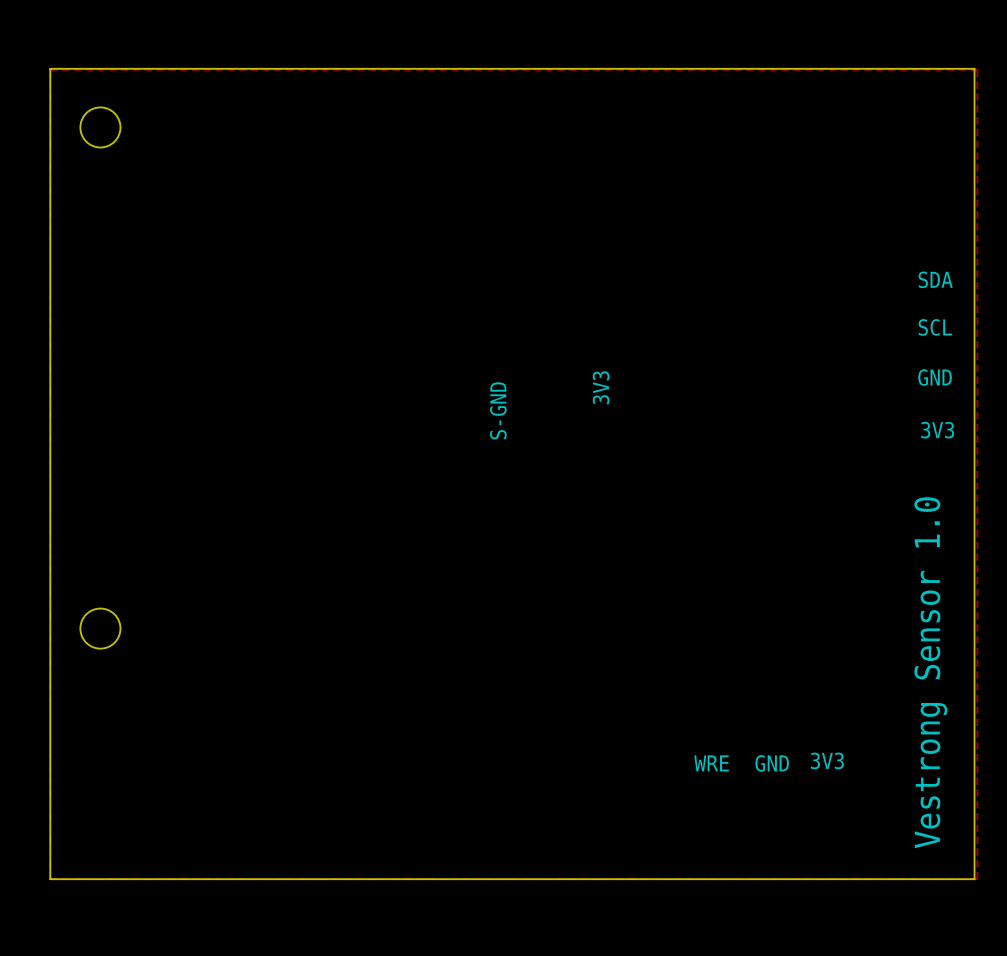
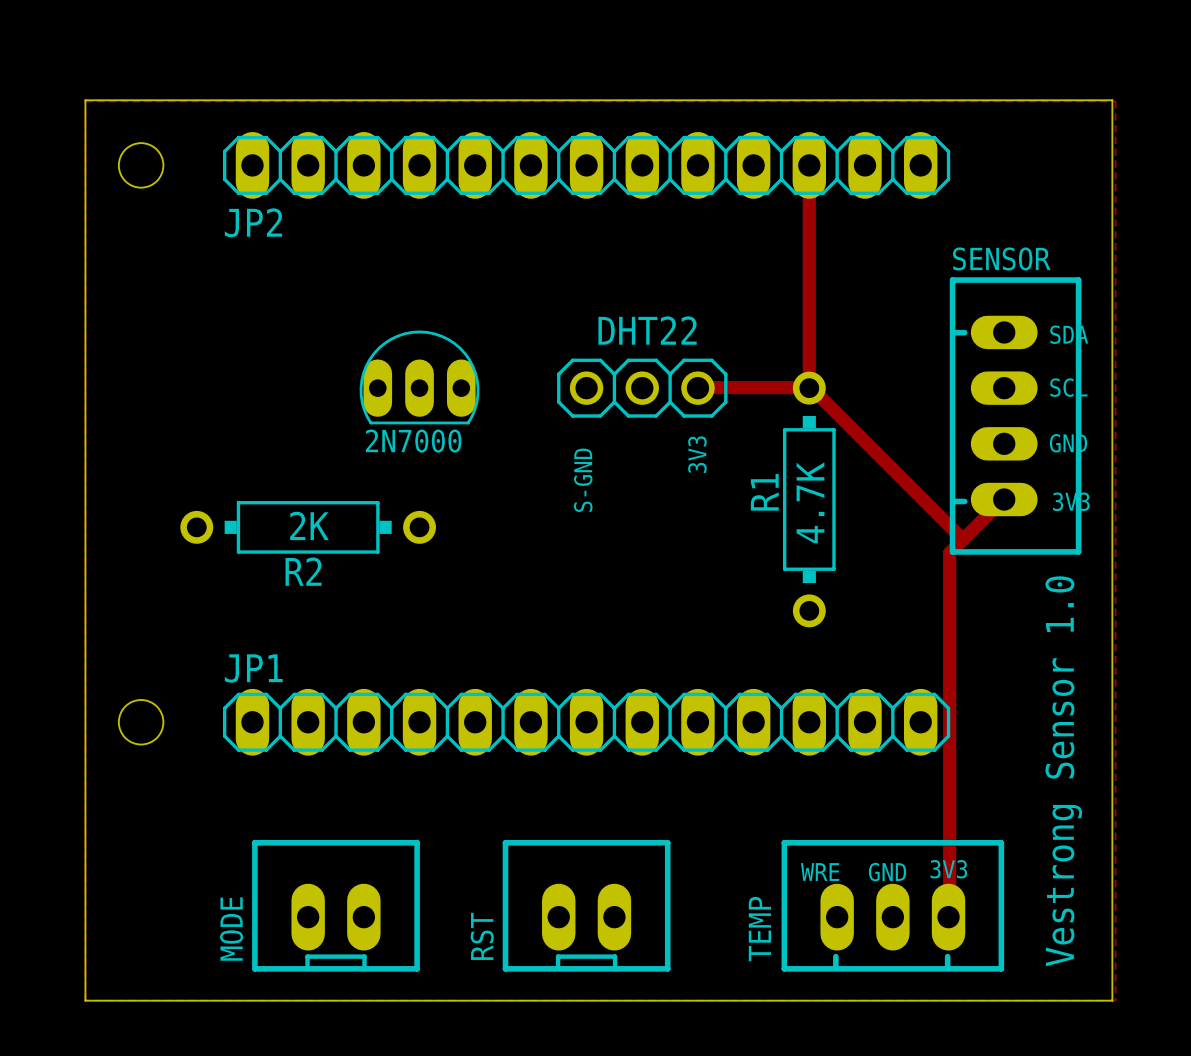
JP2: none -> (586, 165)
track: none -> (809, 165) (809, 388) (814, 390) (963, 539)
part: none -> 2N7000 (419, 377)
DHT22: none -> (642, 388)
track: none -> (809, 387) (697, 388)
SENSOR: none -> (1015, 415)
R1: none -> 4.7K (809, 499)
track: none -> (1004, 499) (949, 552) (948, 917)
R2: none -> 2K (308, 527)
JP1: none -> (586, 722)
MODE: none -> (336, 905)
RST: none -> (586, 905)
TEMP: none -> (892, 905)

